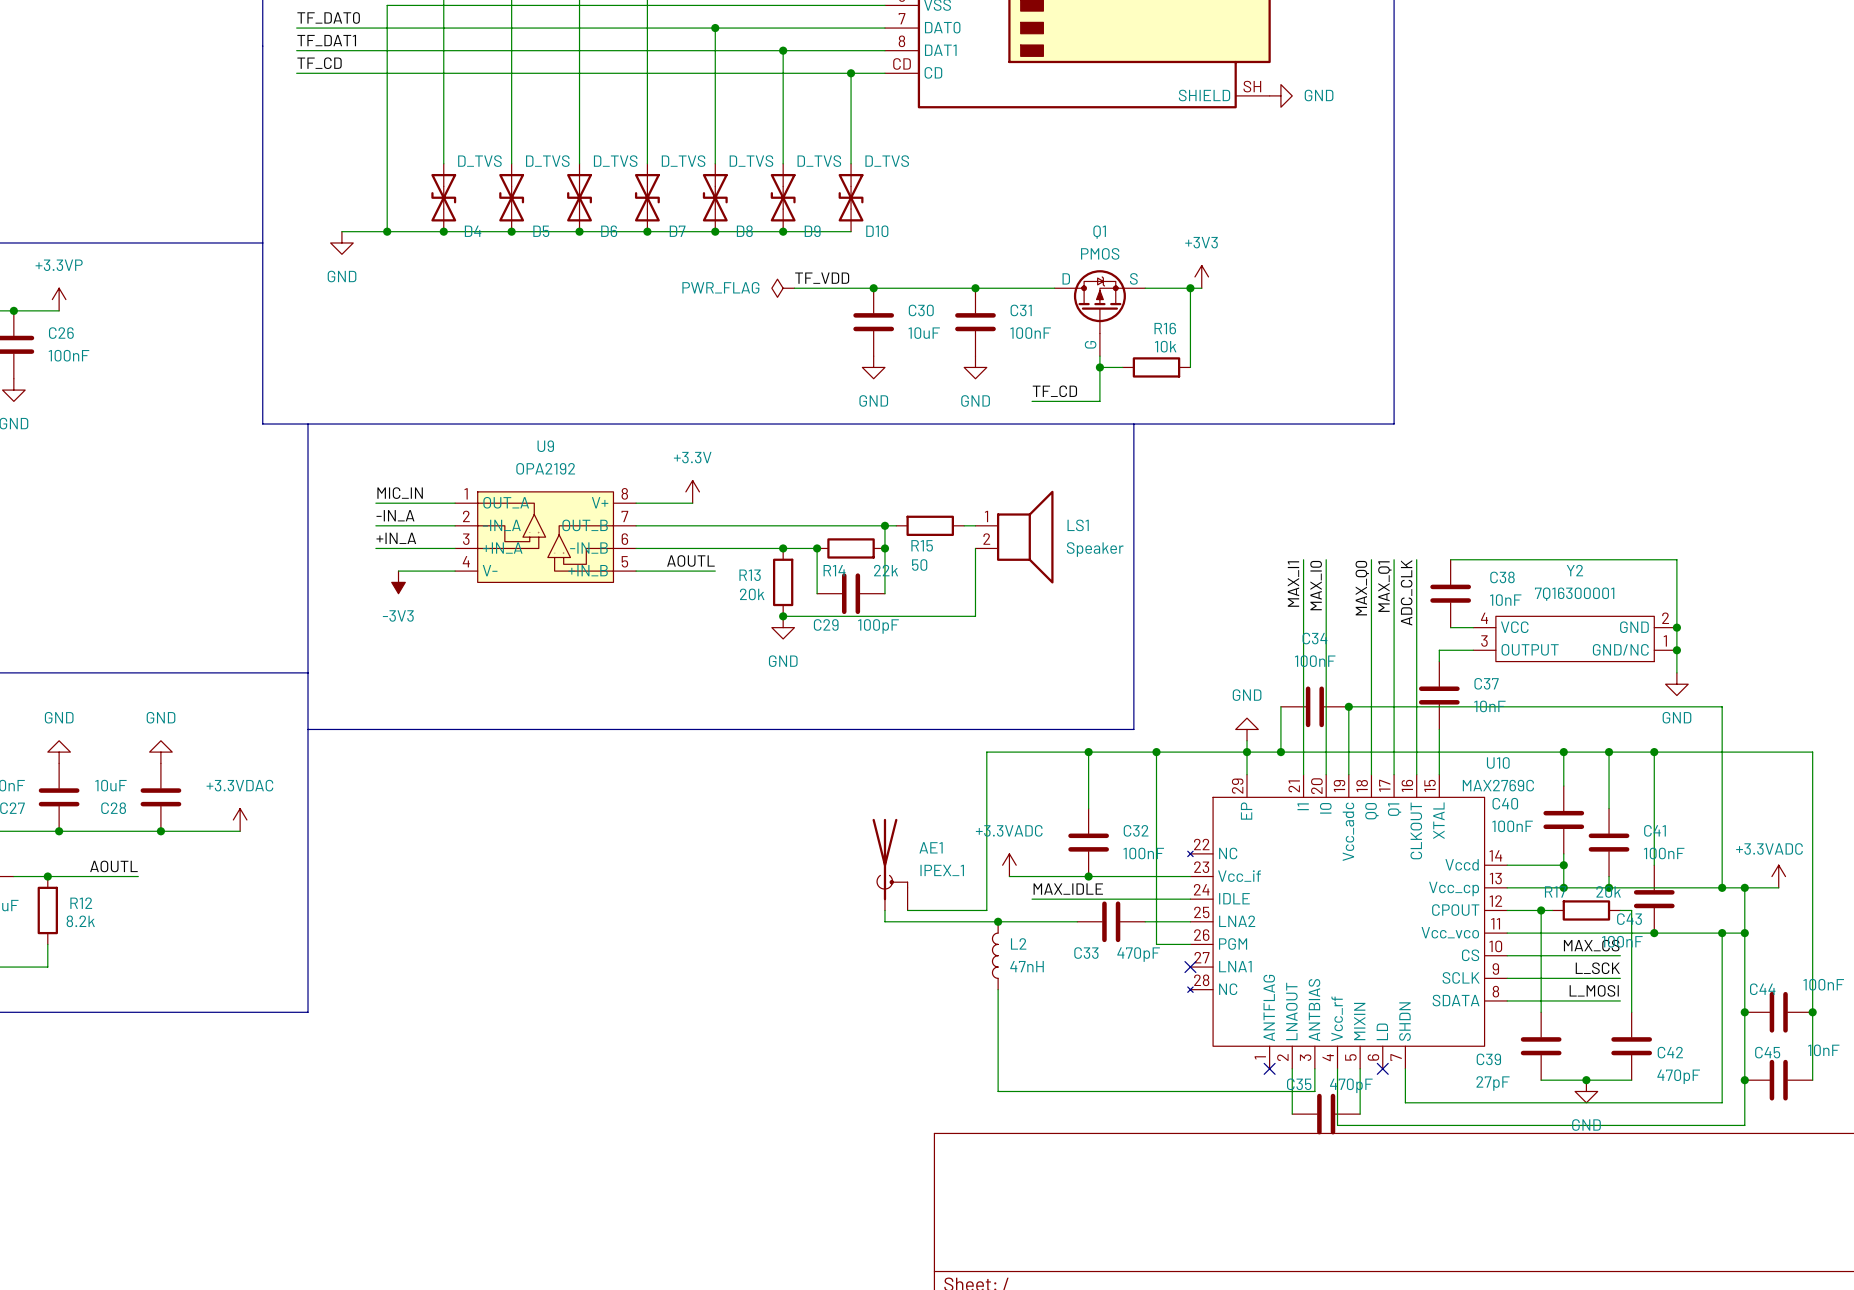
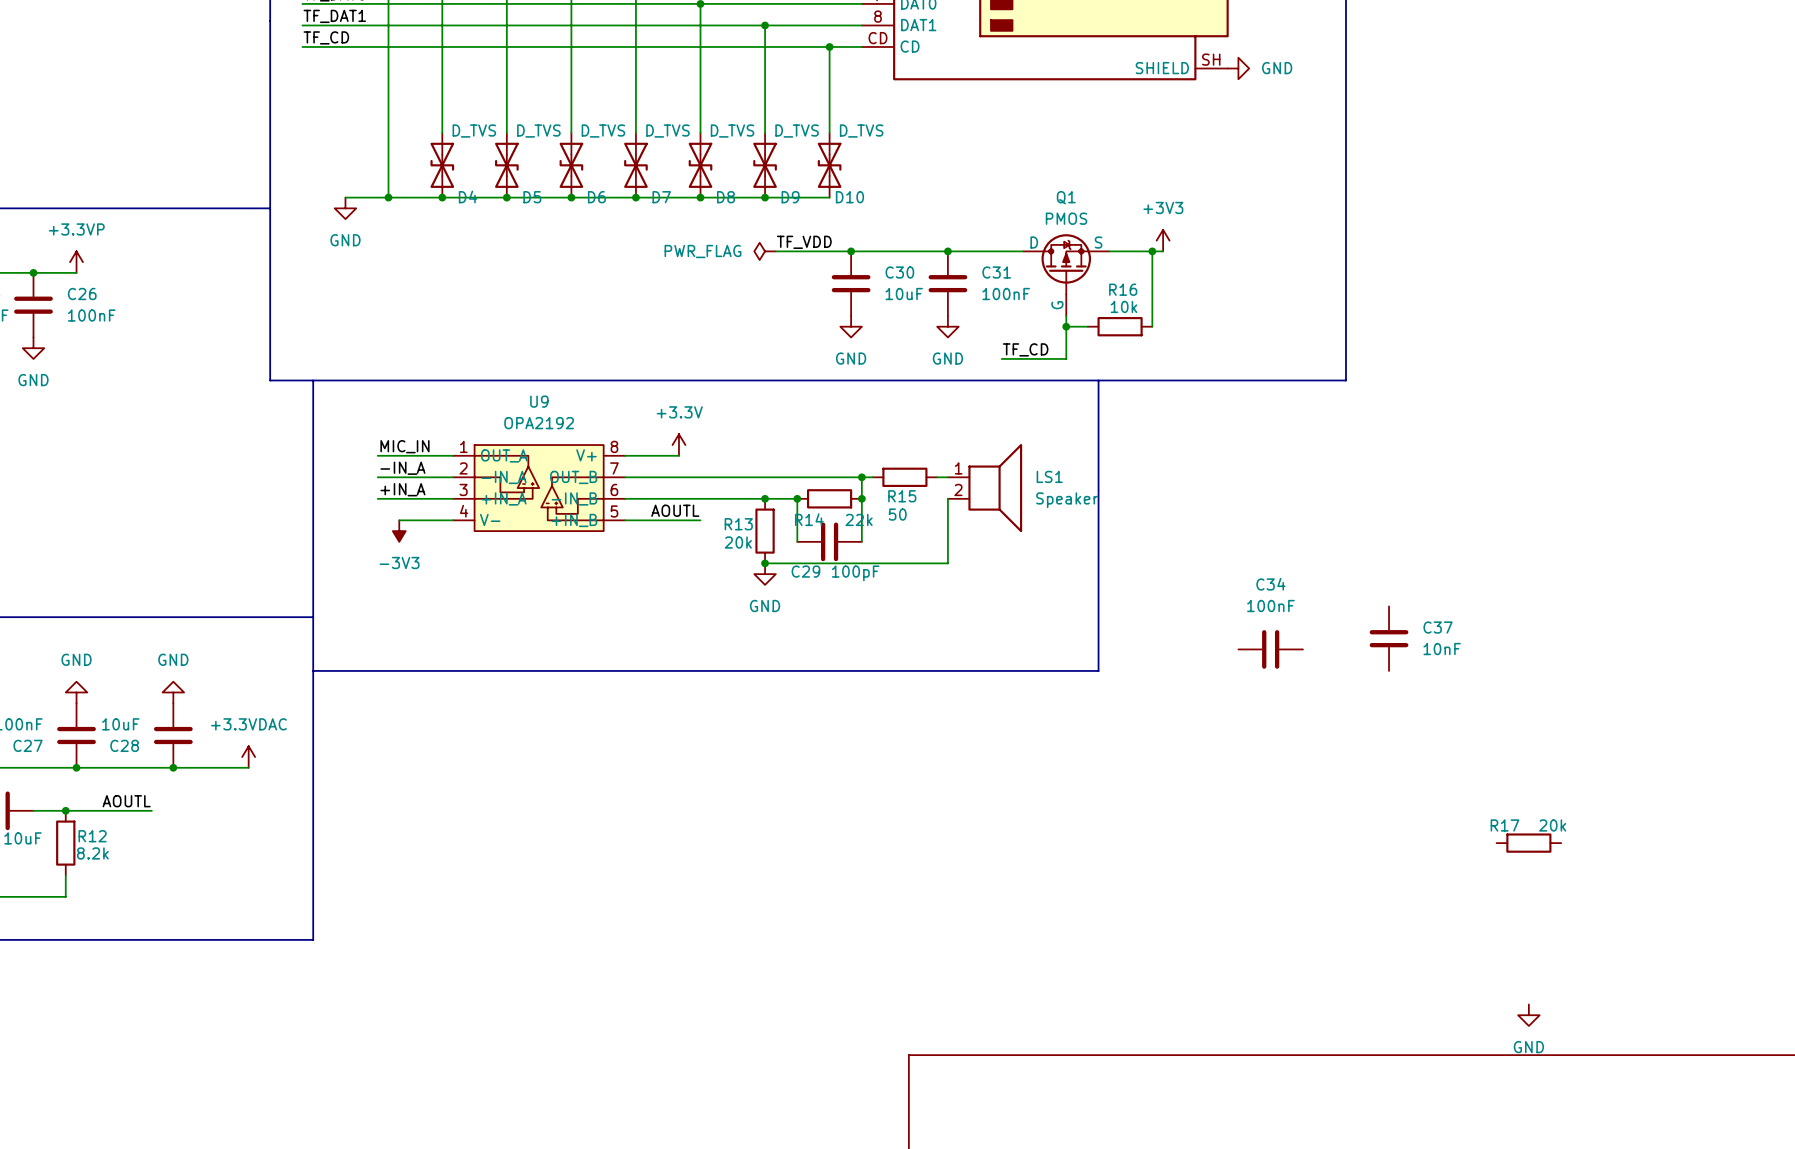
wire: (1303, 559) (1303, 774) -> none
wire: (1326, 559) (1326, 774) -> none
wire: (1371, 559) (1371, 774) -> none
wire: (1394, 559) (1394, 774) -> none
wire: (1416, 559) (1416, 774) -> none
wire: (1450, 559) (1676, 559) (1676, 672) -> none
label: MAX_I1 (1293, 584) -> none
label: MAX_I0 (1316, 585) -> none
label: MAX_Q1 (1384, 586) -> none
label: MAX_Q0 (1362, 588) -> none
label: ADC_CLK (1406, 592) -> none
C38: 10nF (1450, 593) -> none
wire: (1450, 627) (1473, 627) -> none
junction: (1676, 627) -> none
Y2: 7Q16300001 (1575, 638) -> none
wire: (1473, 650) (1439, 650) (1439, 661) -> none
junction: (1676, 650) -> none
power symbol: GND (1676, 684) -> none
wire: (1280, 706) (1280, 752) -> none
junction: (1348, 706) -> none
power symbol: GND (1247, 729) -> none
wire: (1439, 729) (1439, 774) -> none
wire: (1247, 740) (1247, 774) -> none
wire: (1088, 752) (1088, 808) -> none
junction: (1088, 752) -> none
wire: (1156, 752) (1156, 944) (1190, 944) -> none
junction: (1156, 752) -> none
junction: (1247, 752) -> none
junction: (1280, 752) -> none
wire: (1563, 752) (1563, 786) -> none
junction: (1563, 752) -> none
wire: (1609, 752) (1609, 808) -> none
junction: (1609, 752) -> none
wire: (1654, 752) (1654, 865) -> none
junction: (1654, 752) -> none
wire: (1348, 774) (1348, 706) (1722, 706) (1722, 887) -> none
C40: 100nF (1563, 819) -> none
C32: 100nF (1088, 842) -> none
C41: 100nF (1609, 842) -> none
wire: (1563, 853) (1563, 887) -> none
AE1: IPEX_1 (890, 864) -> none
power symbol: +3.3VADC (1009, 865) -> none
wire: (1507, 865) (1563, 865) -> none
junction: (1563, 865) -> none
wire: (1009, 876) (1190, 876) -> none
junction: (1088, 876) -> none
wire: (1609, 876) (1609, 887) -> none
power symbol: +3.3VADC (1778, 876) -> none
wire: (1507, 887) (1778, 887) -> none
junction: (1563, 887) -> none
junction: (1609, 887) -> none
junction: (1722, 887) -> none
wire: (1744, 887) (1744, 1125) (1337, 1125) (1337, 1068) -> none
junction: (1744, 887) -> none
label: MAX_IDLE (1068, 889) -> none
wire: (1032, 899) (1190, 899) -> none
C43: 100nF (1654, 899) -> none
wire: (884, 910) (884, 921) (1077, 921) -> none
wire: (907, 910) (986, 910) (986, 752) (1812, 752) (1812, 1080) -> none
wire: (1507, 910) (1552, 910) -> none
wire: (1541, 910) (1541, 1012) -> none
junction: (1541, 910) -> none
wire: (1620, 910) (1631, 910) (1631, 1012) -> none
junction: (998, 921) -> none
C33: 470pF (1111, 921) -> none
wire: (1145, 921) (1190, 921) -> none
U10: MAX2769C (1347, 921) -> none
wire: (1507, 933) (1744, 933) -> none
junction: (1654, 933) -> none
wire: (1722, 933) (1722, 1102) (1405, 1102) (1405, 1068) -> none
junction: (1722, 933) -> none
junction: (1744, 933) -> none
label: MAX_CS (1591, 945) -> none
L2: 47nH (995, 955) -> none
wire: (1507, 955) (1620, 955) -> none
no-connect mark: (1190, 967) -> none
label: L_SCK (1597, 968) -> none
wire: (1507, 978) (1620, 978) -> none
wire: (998, 989) (998, 1091) (1314, 1091) (1314, 1068) -> none
label: L_MOSI (1594, 990) -> none
wire: (1507, 1000) (1620, 1000) -> none
junction: (1744, 1012) -> none
C44: 100nF (1778, 1012) -> none
junction: (1812, 1012) -> none
C39: 27pF (1541, 1046) -> none
C42: 470pF (1631, 1046) -> none
no-connect mark: (1269, 1068) -> none
wire: (1292, 1068) (1292, 1114) -> none
wire: (1360, 1068) (1360, 1114) -> none
no-connect mark: (1382, 1068) -> none
wire: (1541, 1080) (1631, 1080) -> none
junction: (1586, 1080) -> none
junction: (1744, 1080) -> none
C45: 10nF (1778, 1080) -> none
C35: 470pF (1326, 1114) -> none

